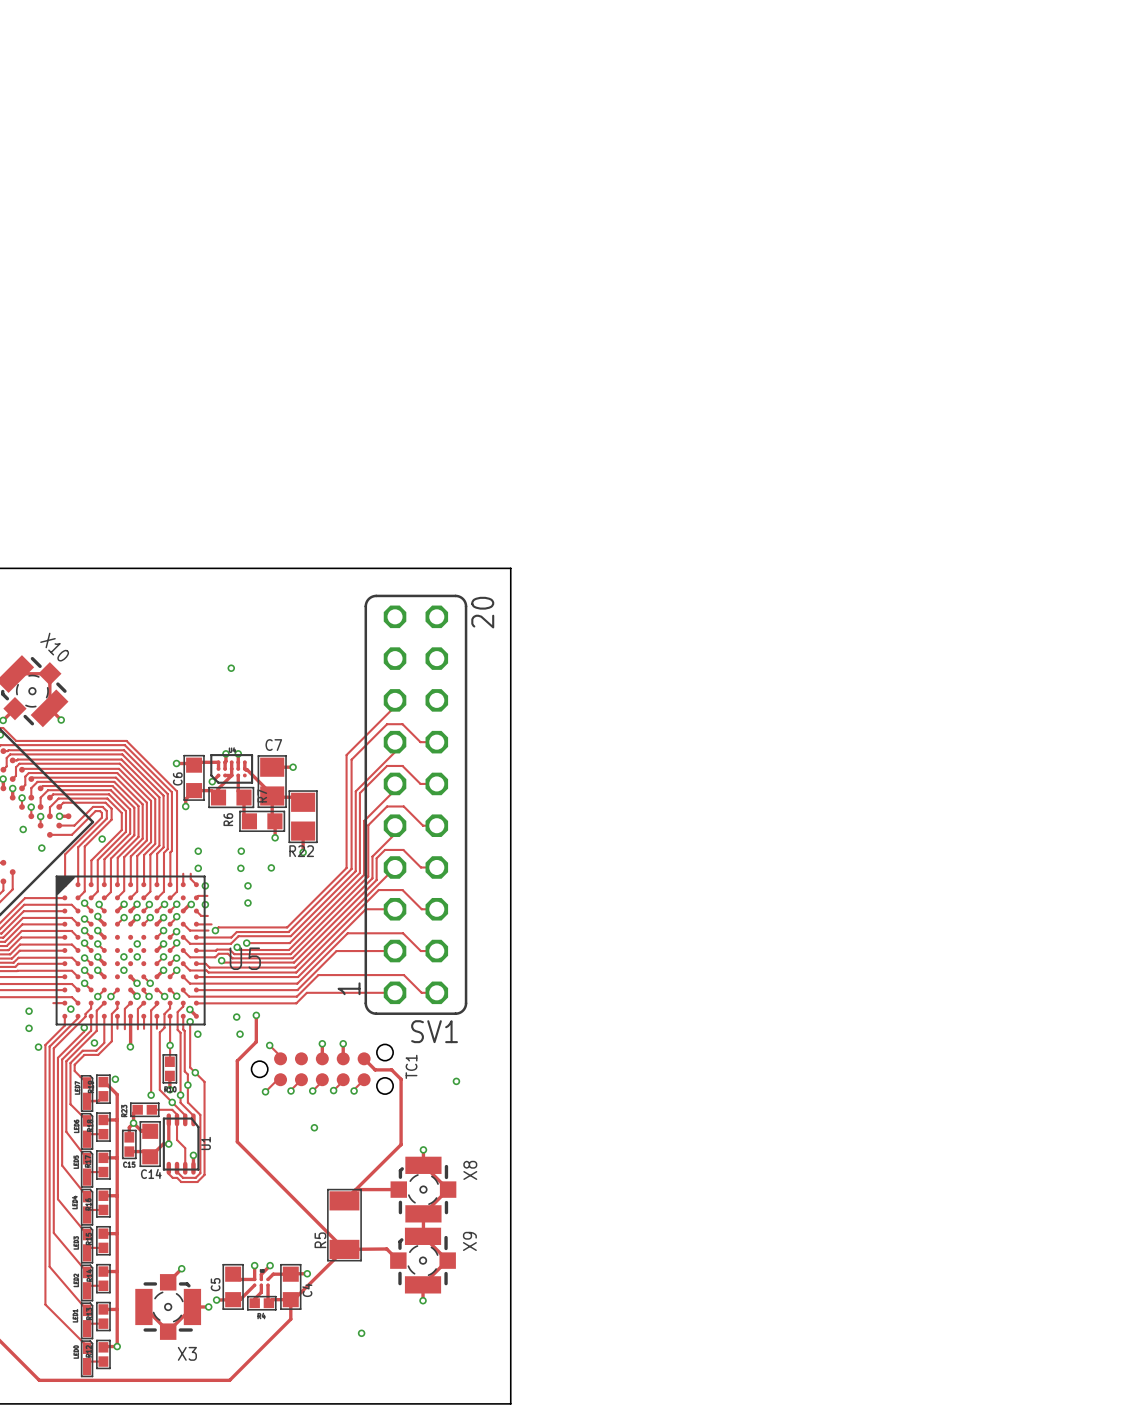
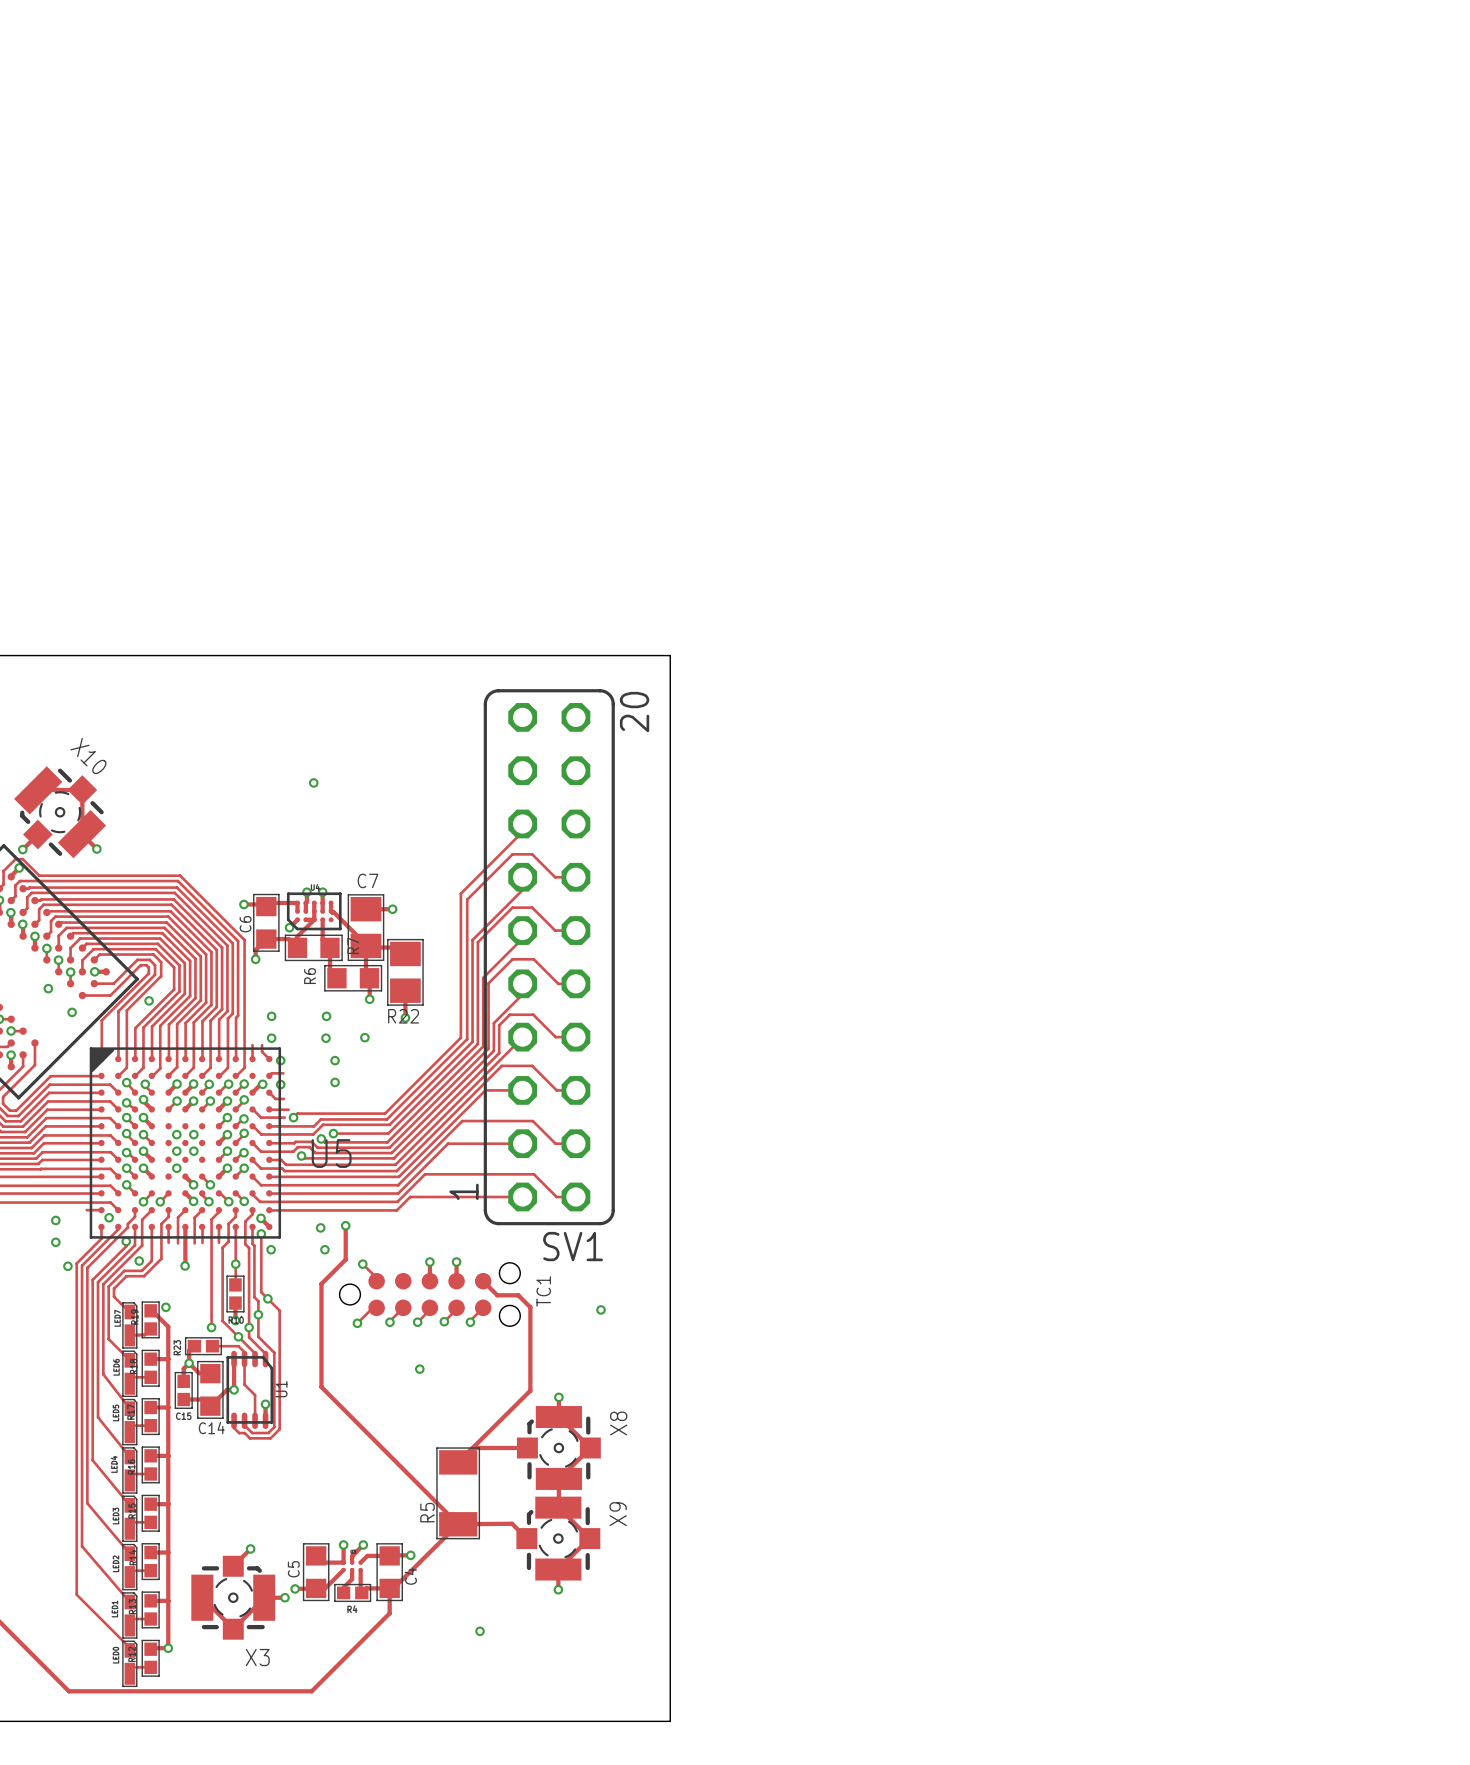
via: none -> (176, 1134)

